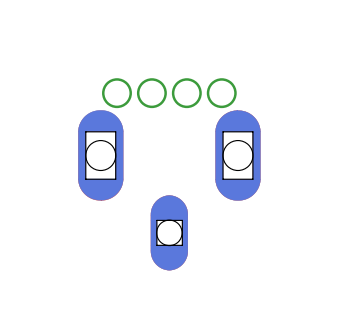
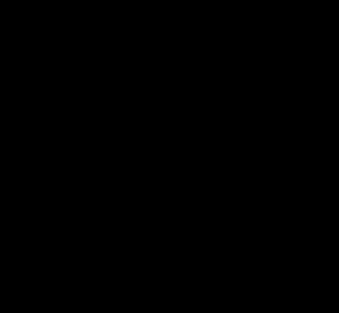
part: (169, 174) -> none

